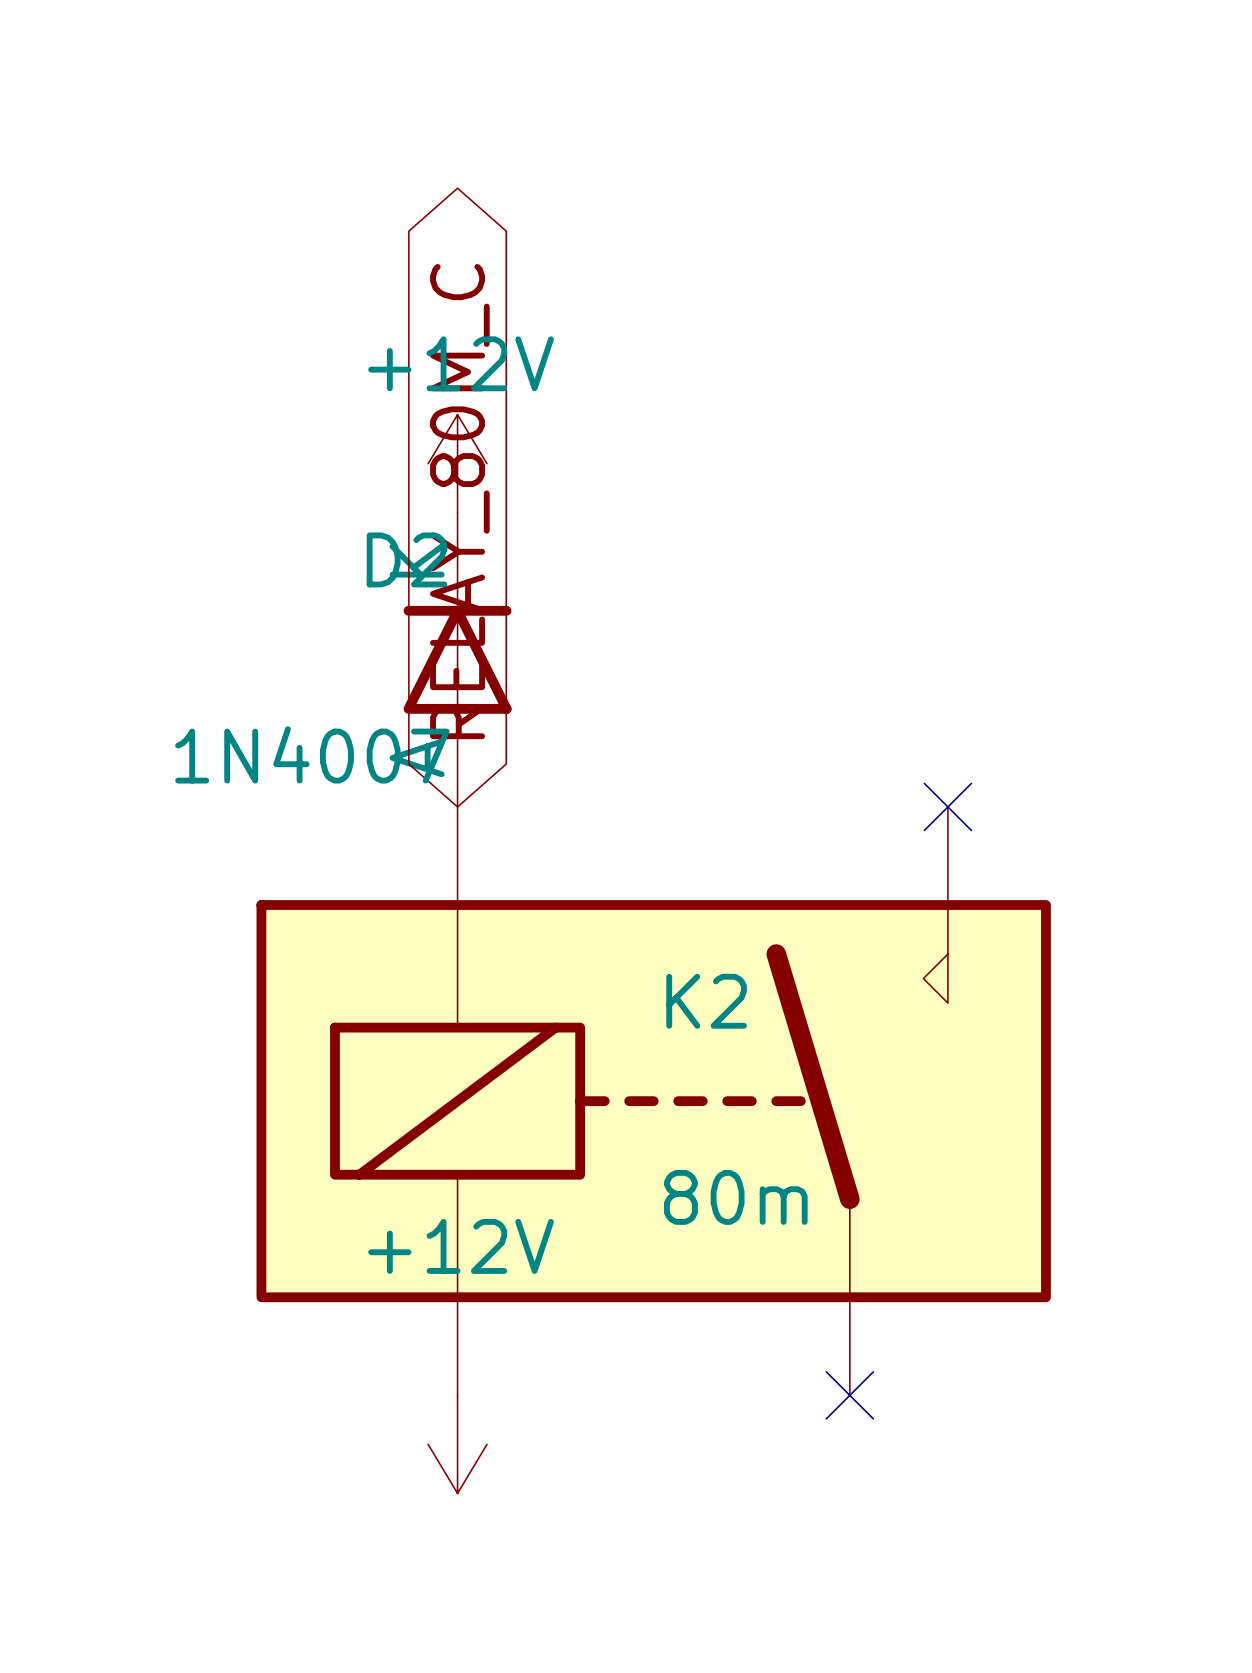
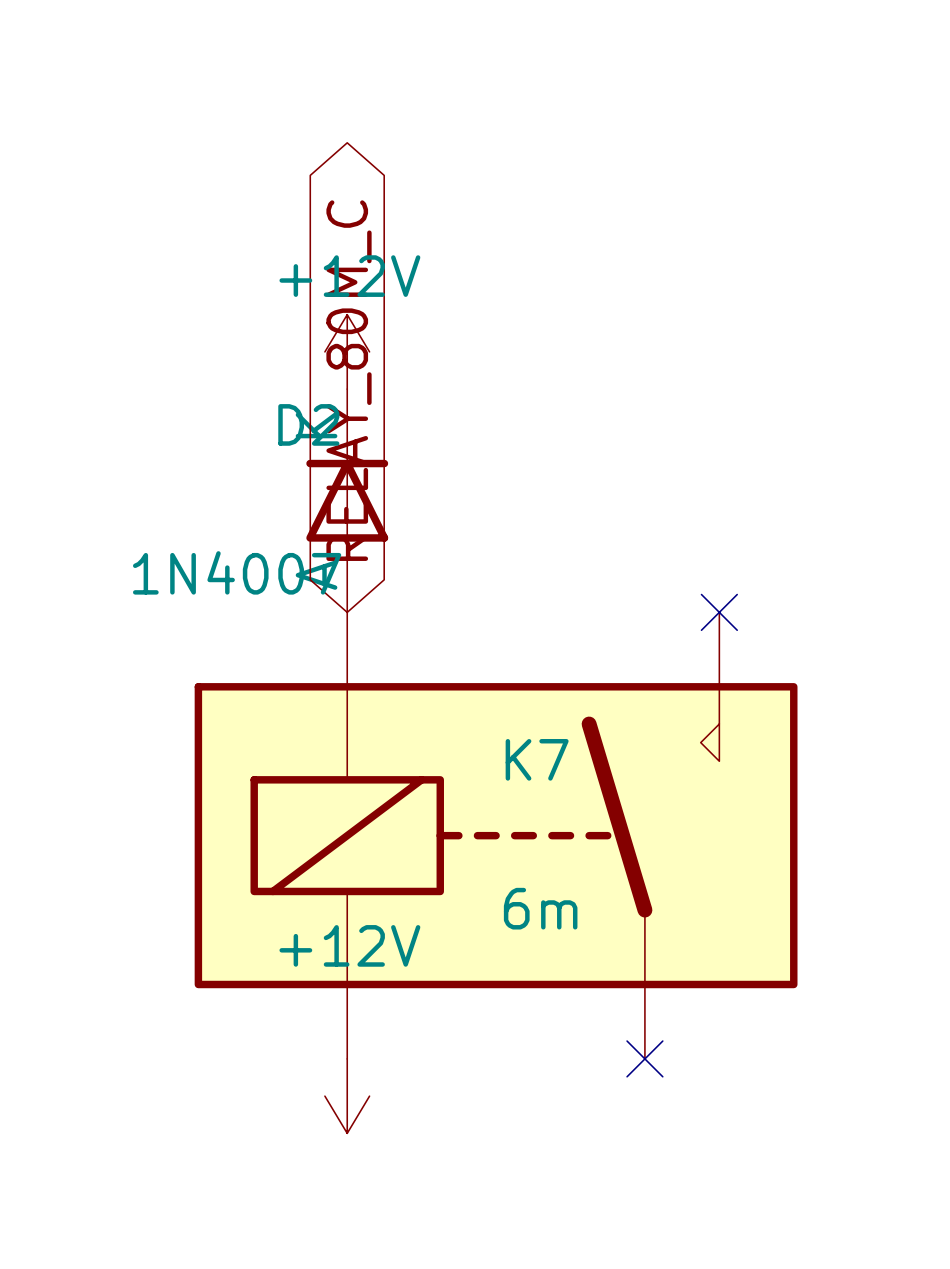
K2 name: K2 (706, 1001) -> K7 (537, 759)
K2 value: 80m (735, 1197) -> 6m (540, 908)

